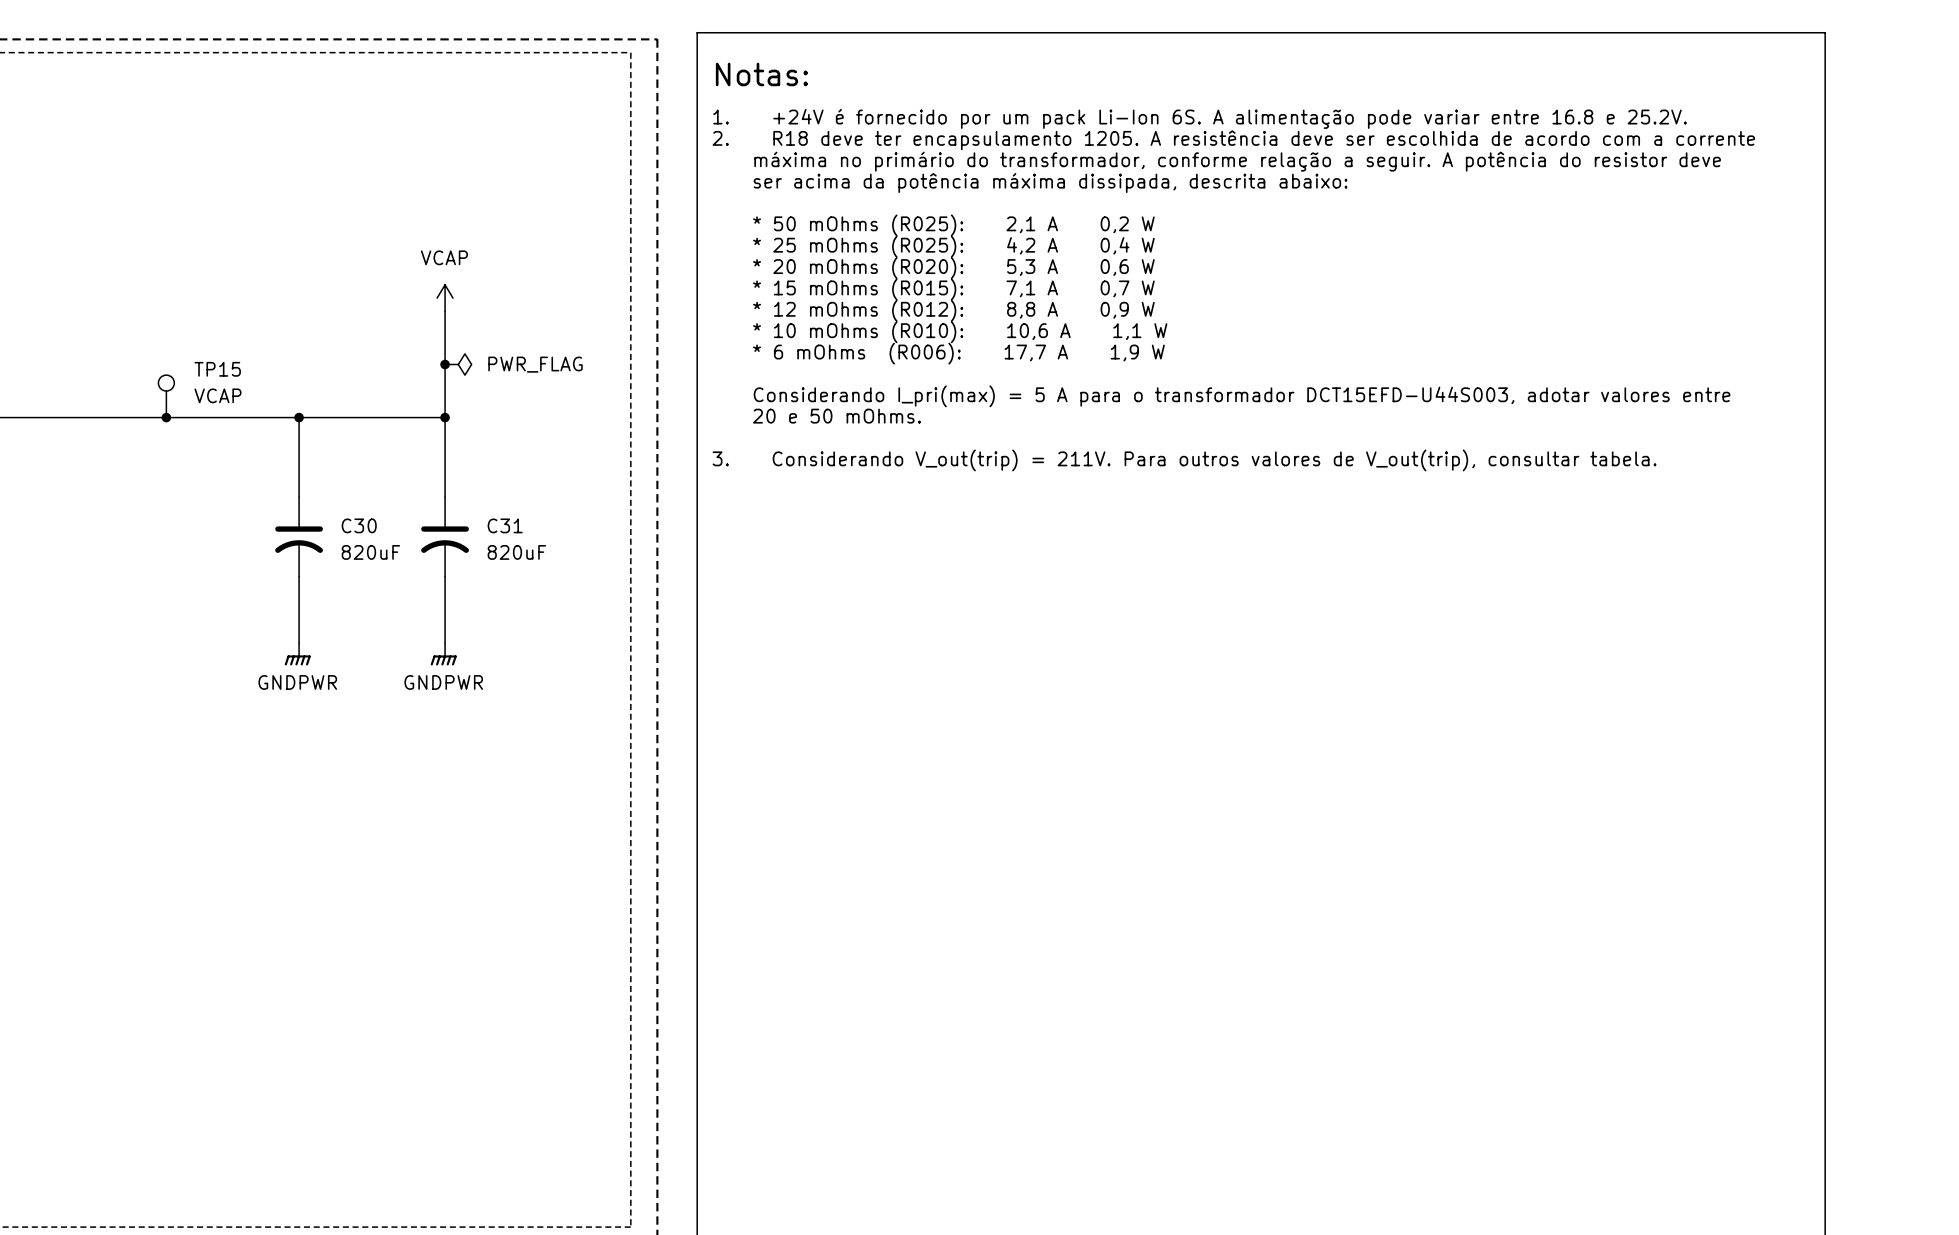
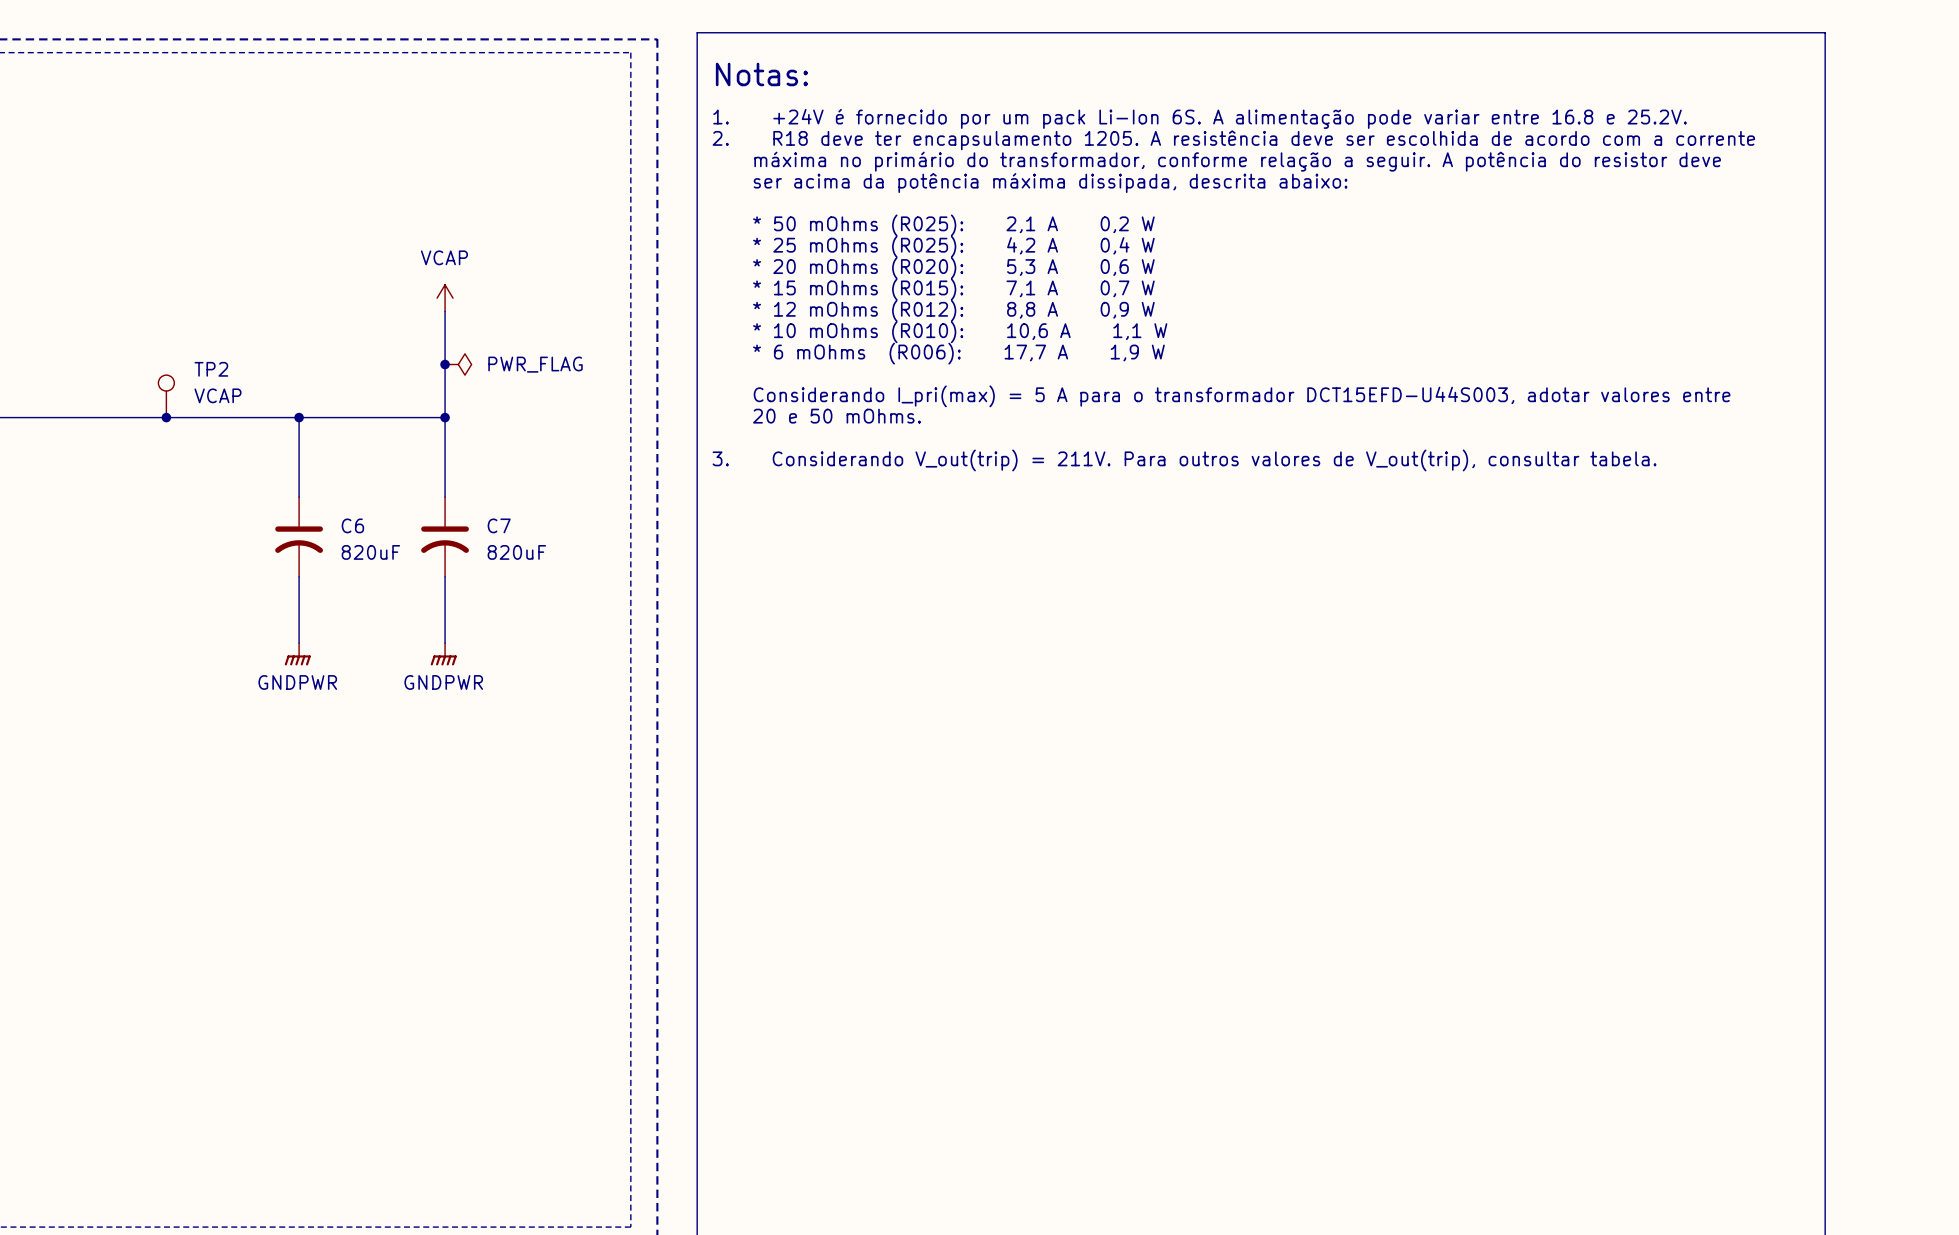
TP15 name: TP15 (217, 369) -> TP2 (211, 369)
C30 name: C30 (359, 525) -> C6 (352, 525)
C31 name: C31 (505, 525) -> C7 (499, 525)

